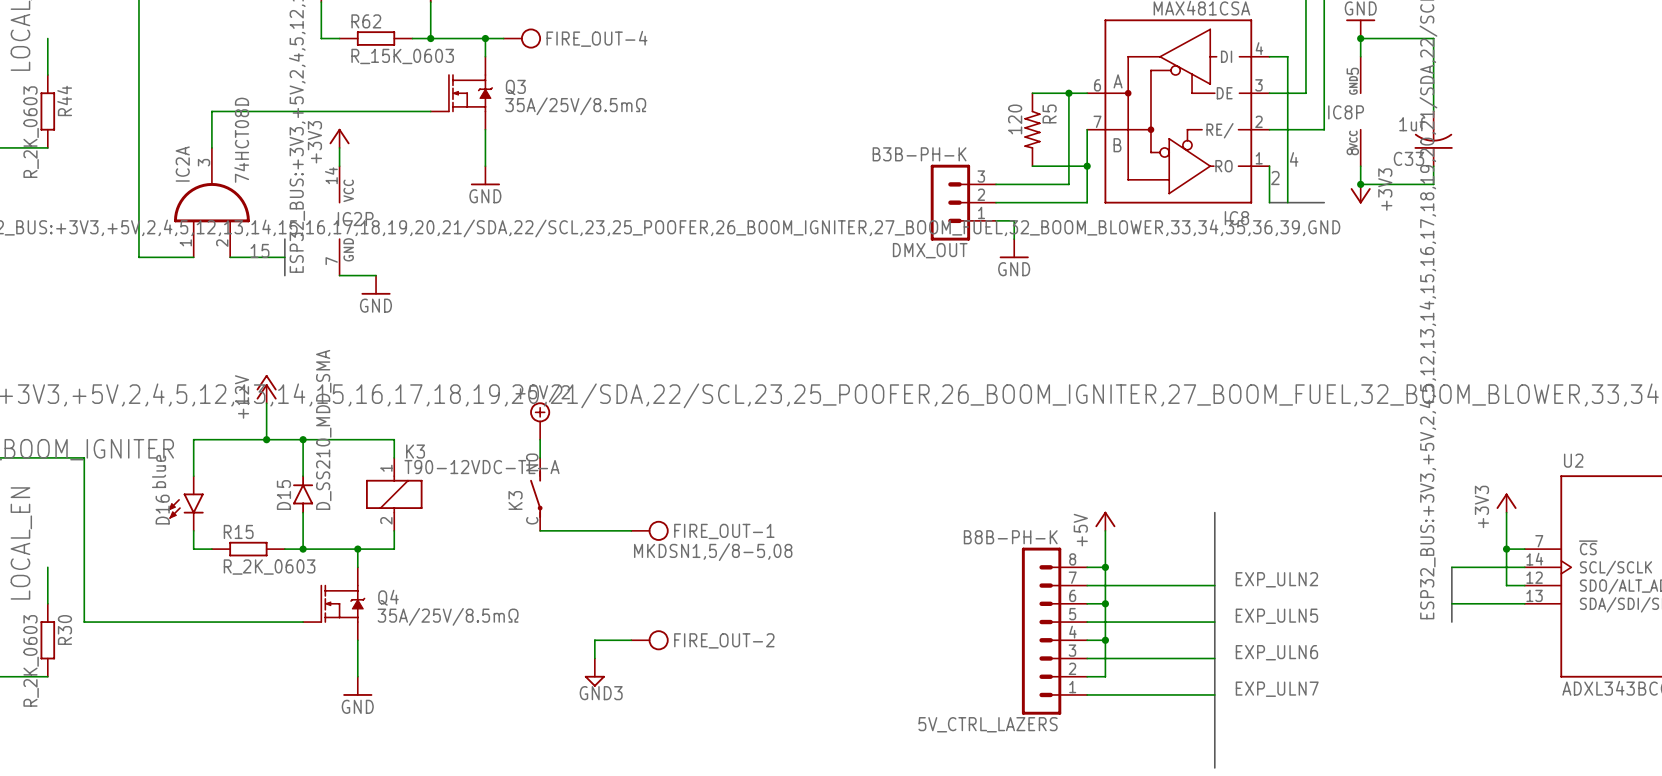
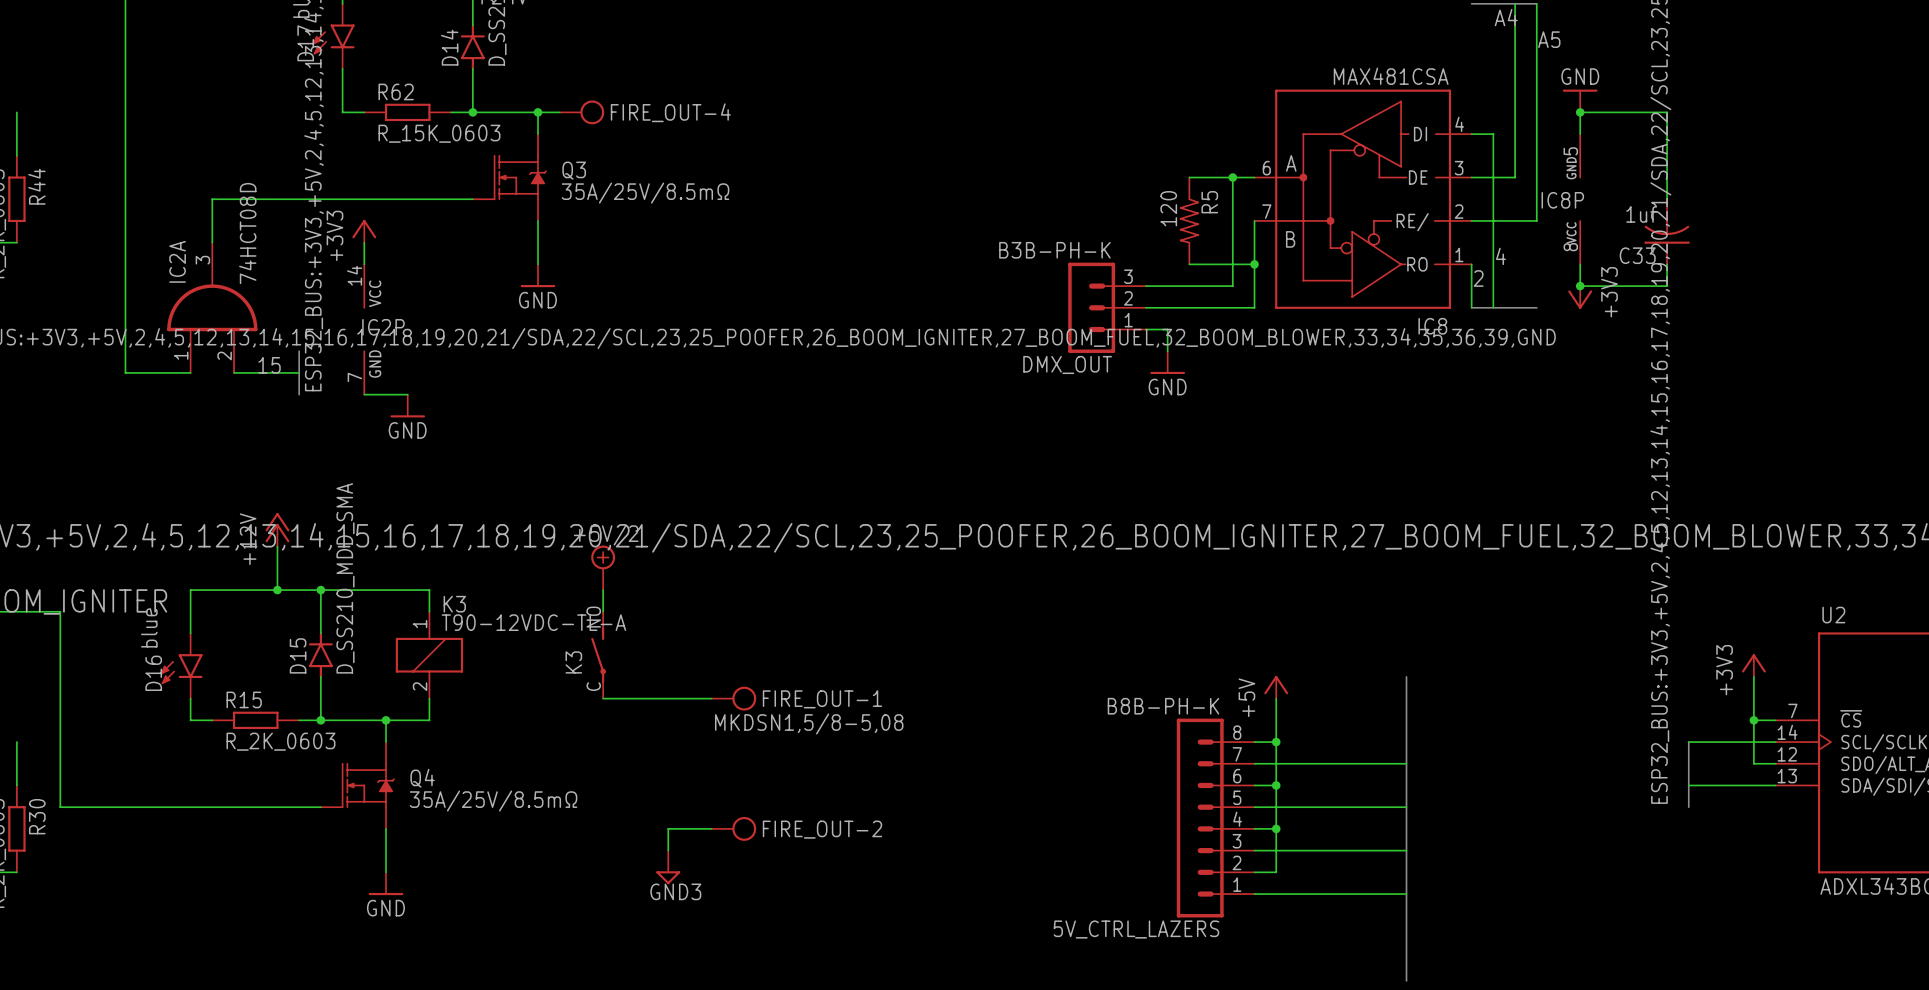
label: EXP_ULN2 (1276, 579) -> none
label: EXP_ULN5 (1276, 616) -> none
label: EXP_ULN6 (1276, 652) -> none
label: EXP_ULN7 (1277, 689) -> none

